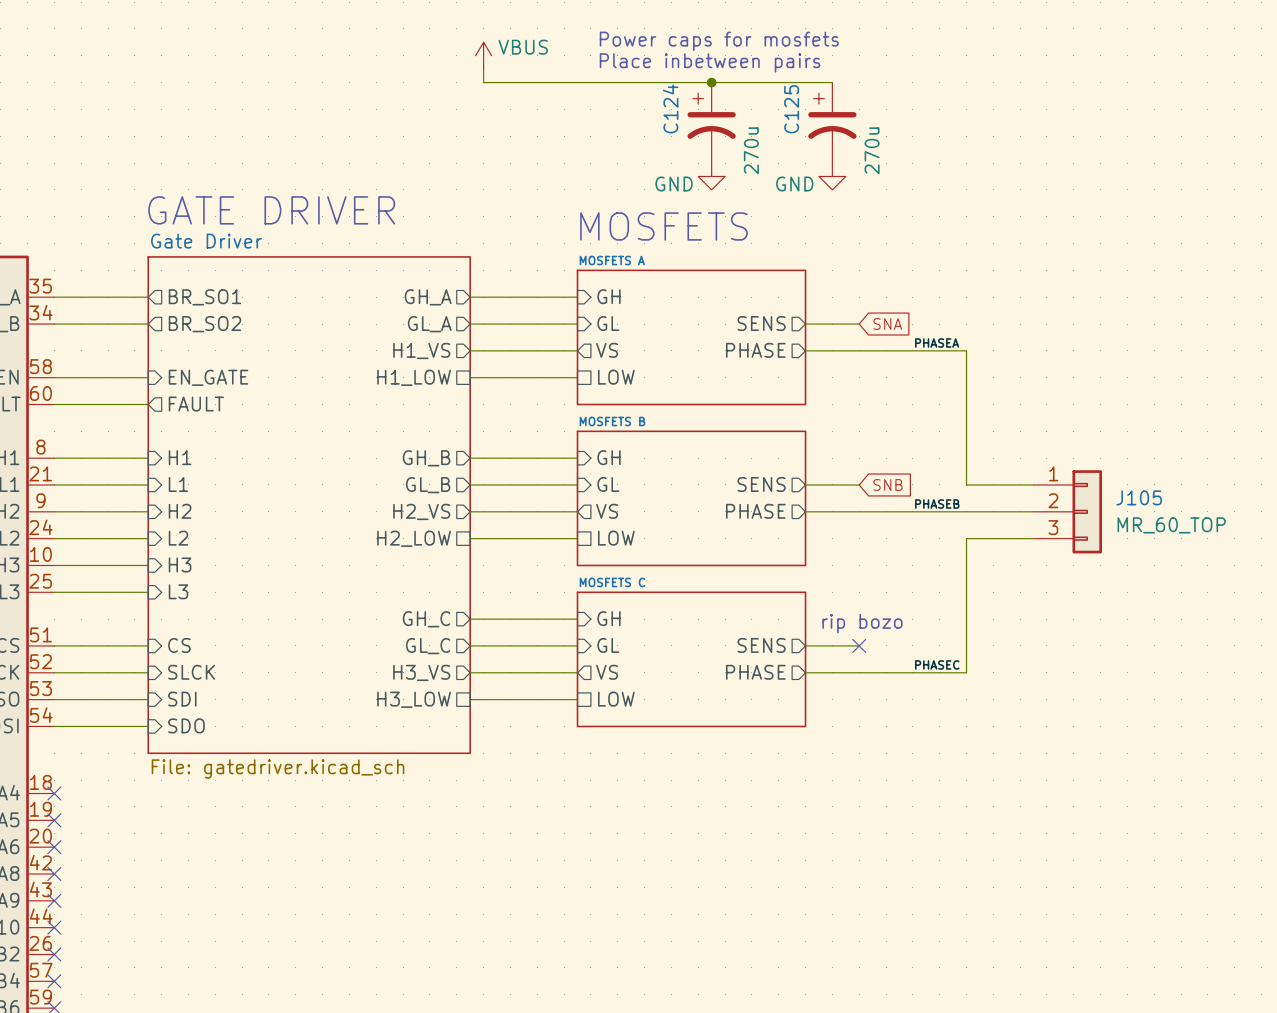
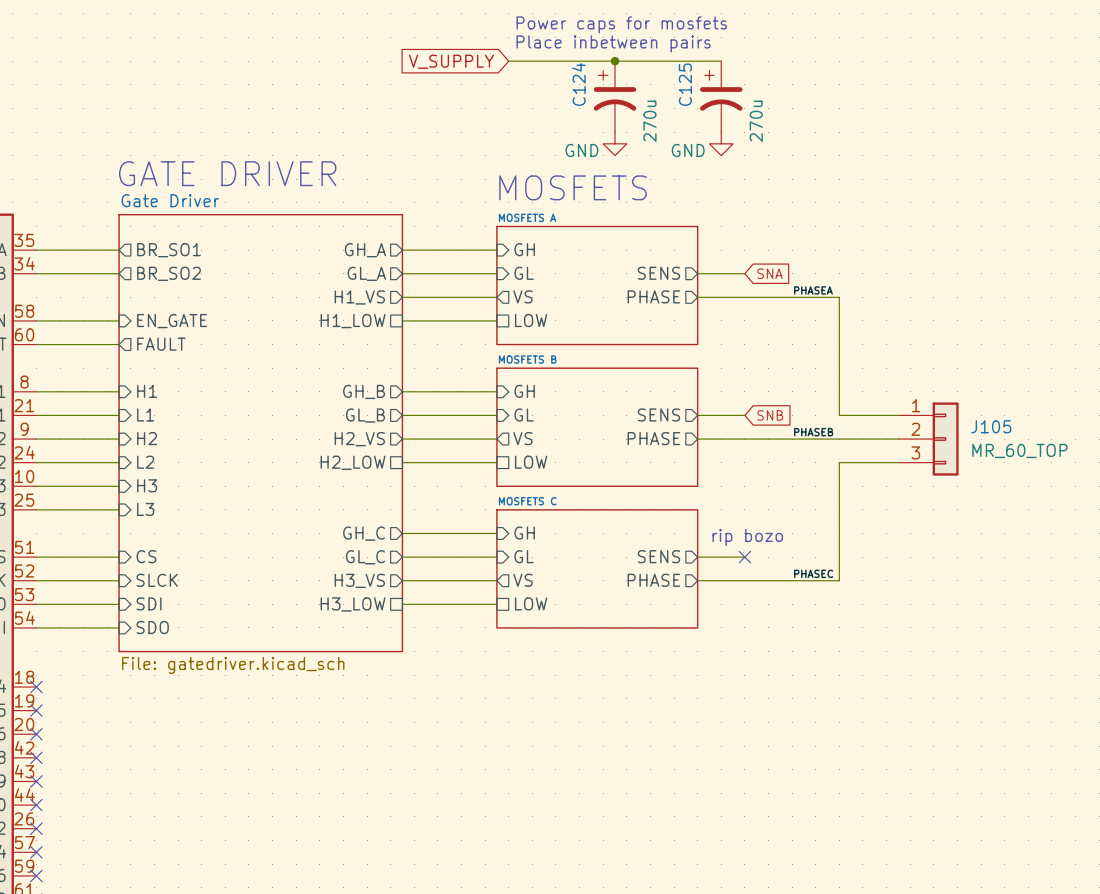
power symbol: VBUS (483, 55) -> none
wire: (483, 69) (483, 82) (590, 82) -> none
global label: none -> V_SUPPLY (451, 61)

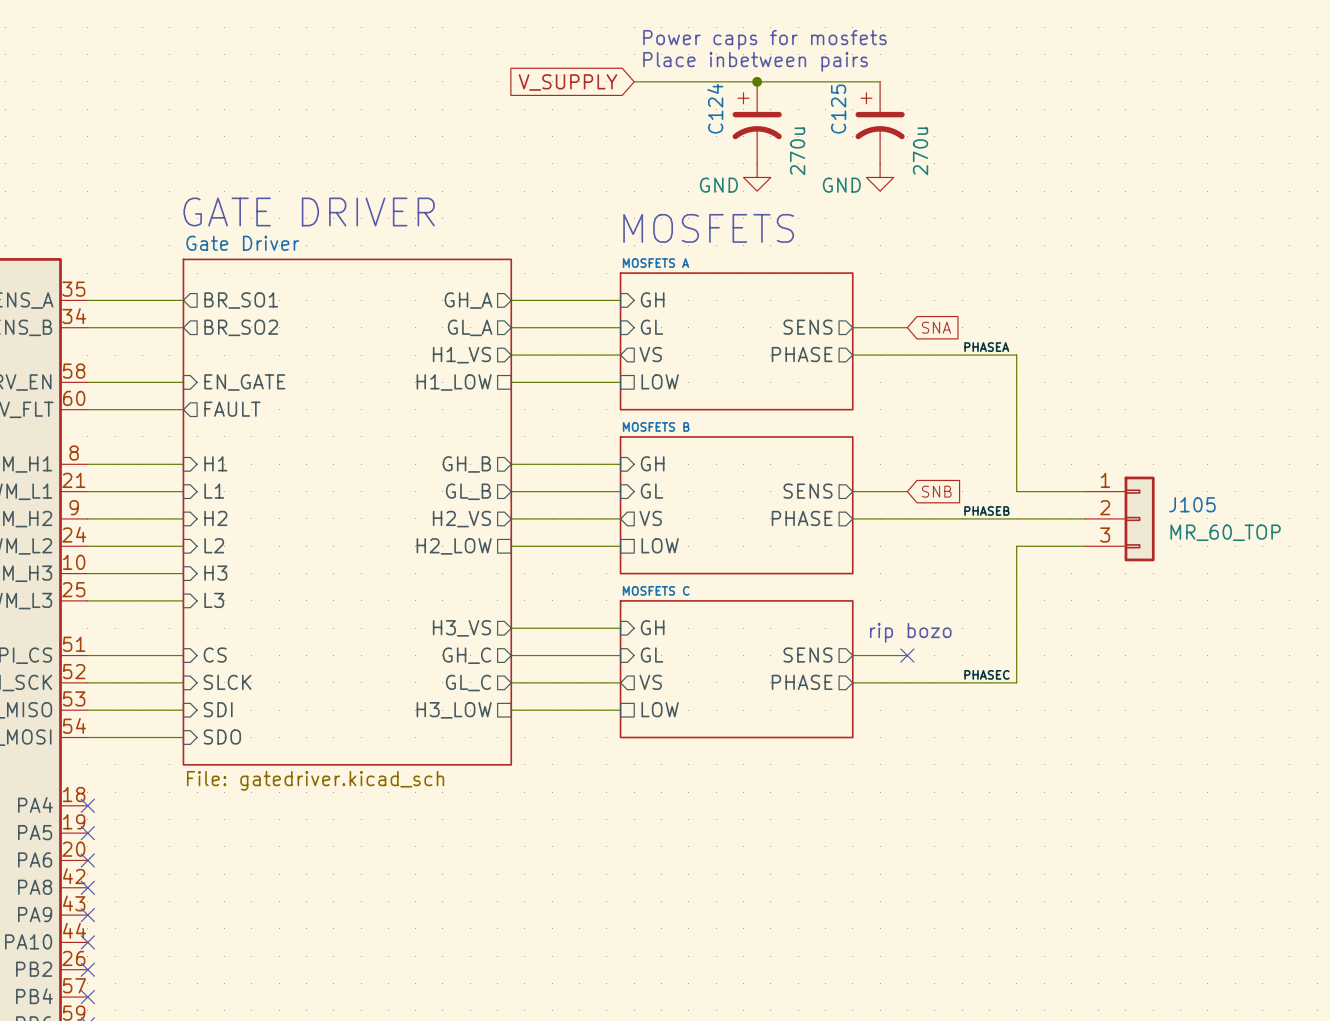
sheet pin: GH_C (364, 533) -> H3_VS (461, 628)
sheet pin: GL_C (365, 557) -> GH_C (466, 655)
sheet pin: H3_VS (359, 580) -> GL_C (468, 683)

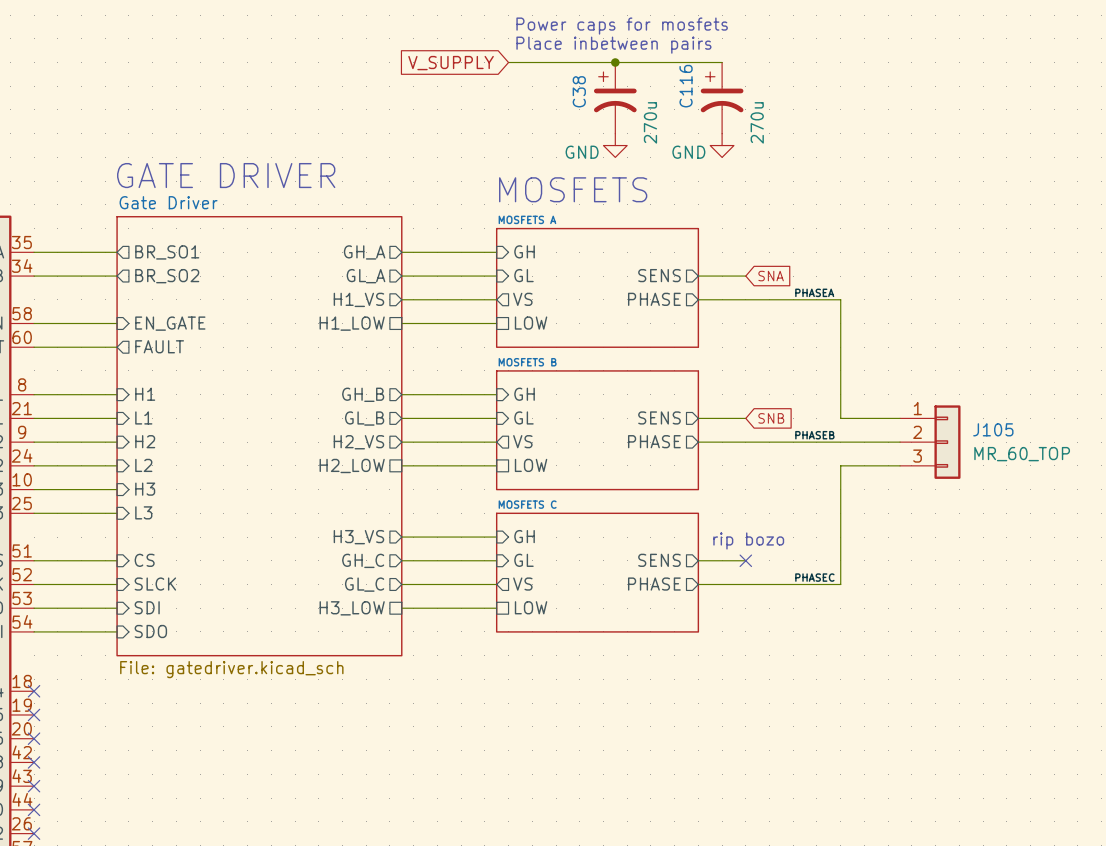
C124 name: C124 (715, 108) -> C38 (579, 91)
C125 name: C125 (838, 109) -> C116 (686, 86)

